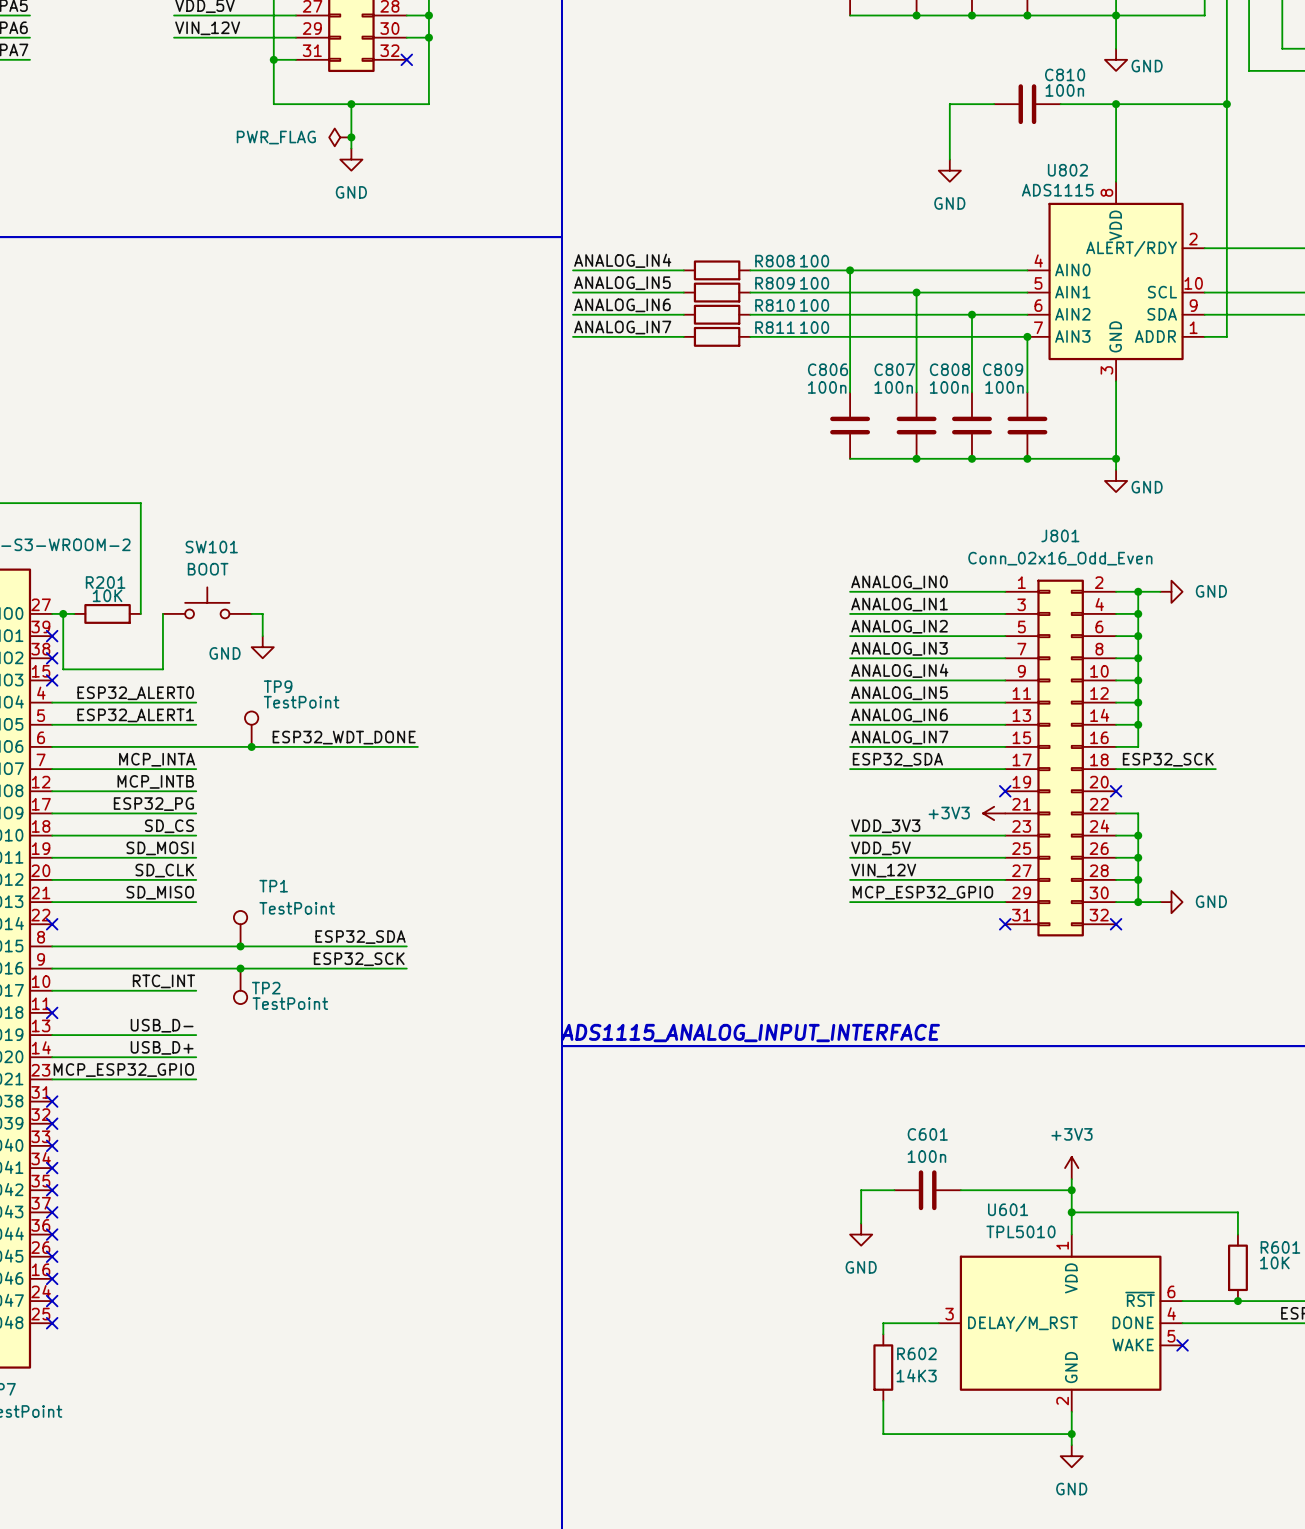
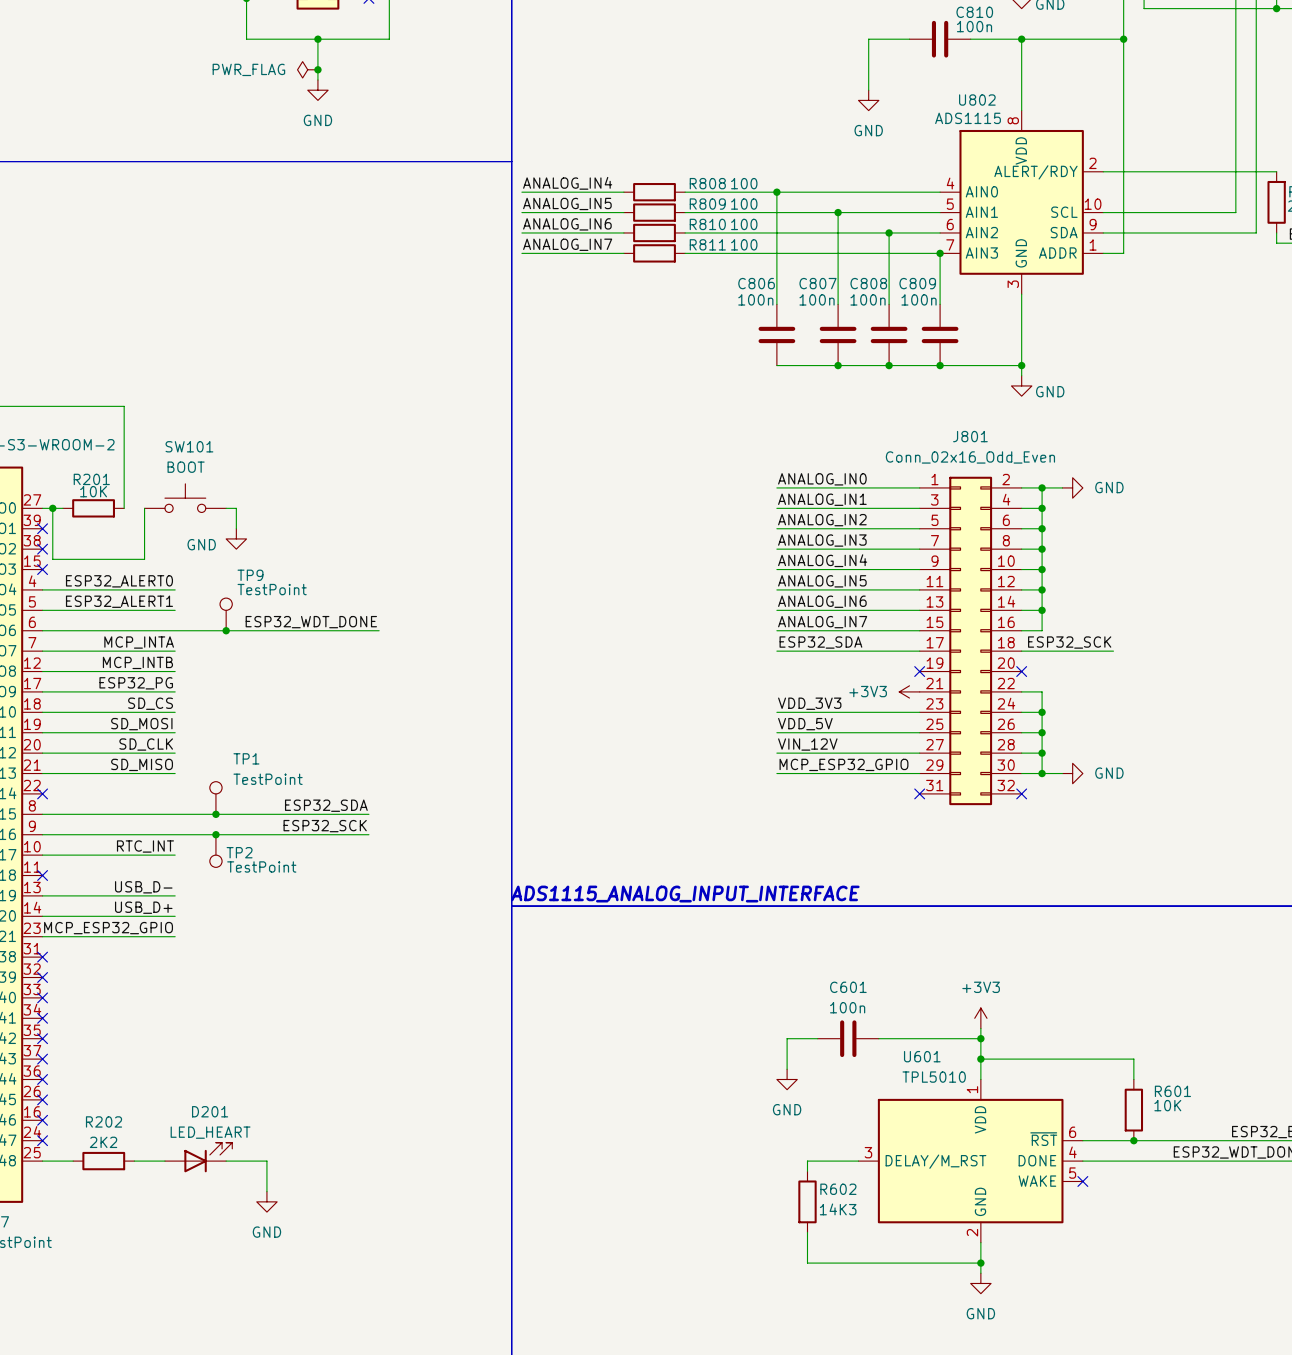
D201: none -> LED_HEART (198, 1157)
wire: none -> (42, 1161) (73, 1161)
no-connect mark: (52, 1323) -> none
R202: none -> 2K2 (103, 1161)
wire: none -> (134, 1161) (164, 1161)
wire: none -> (226, 1161) (266, 1161) (266, 1191)
power symbol: none -> GND (266, 1201)

